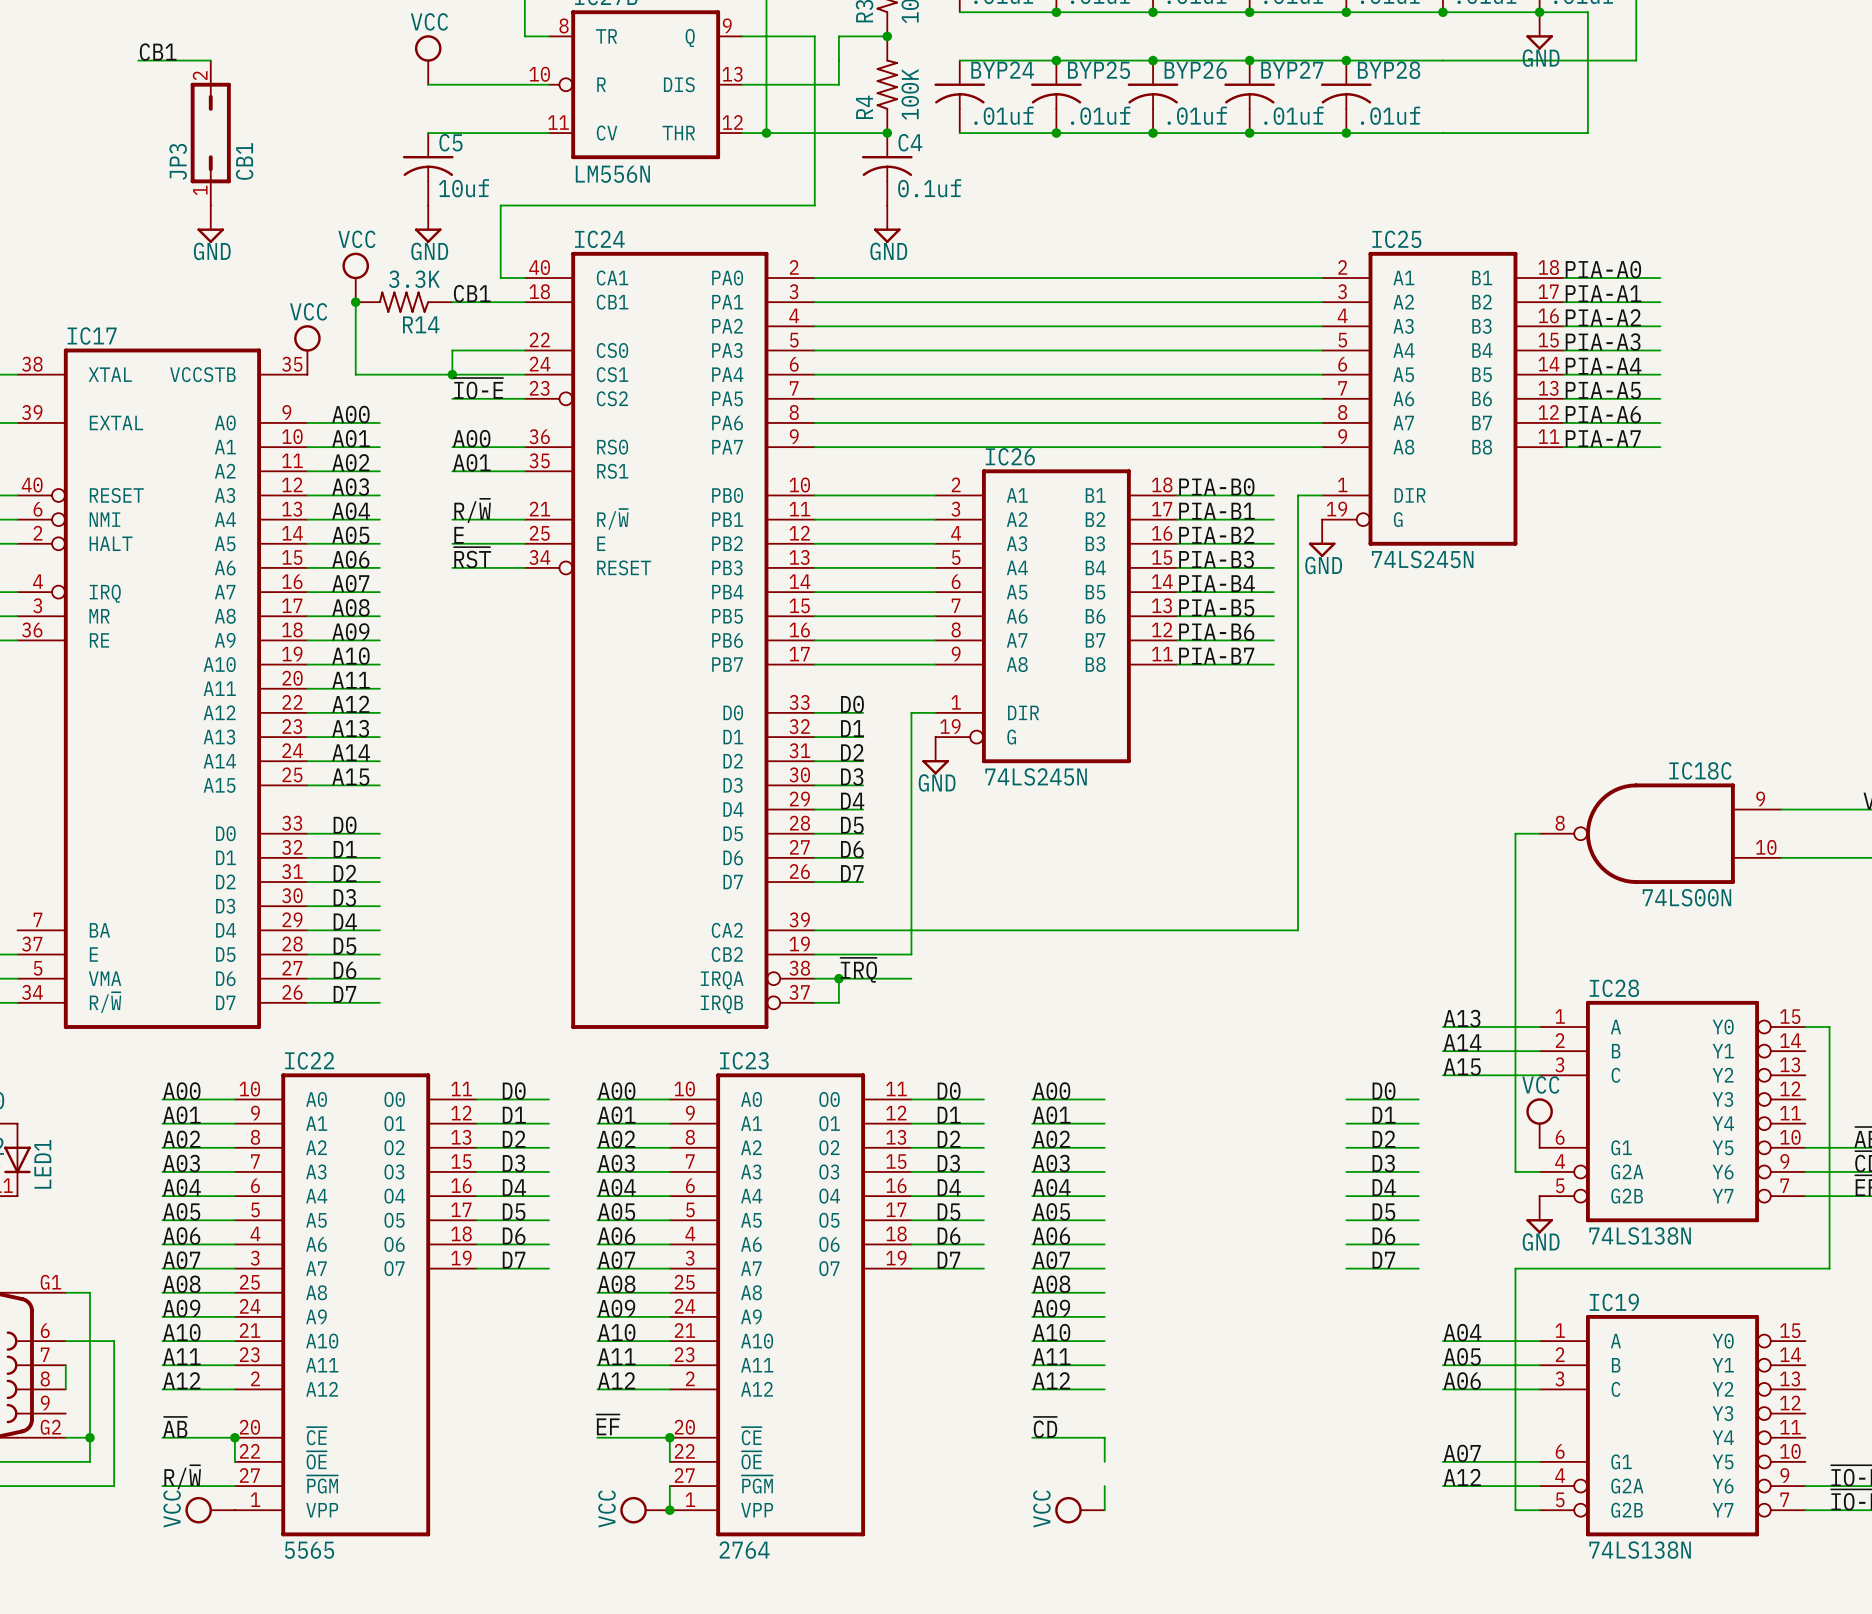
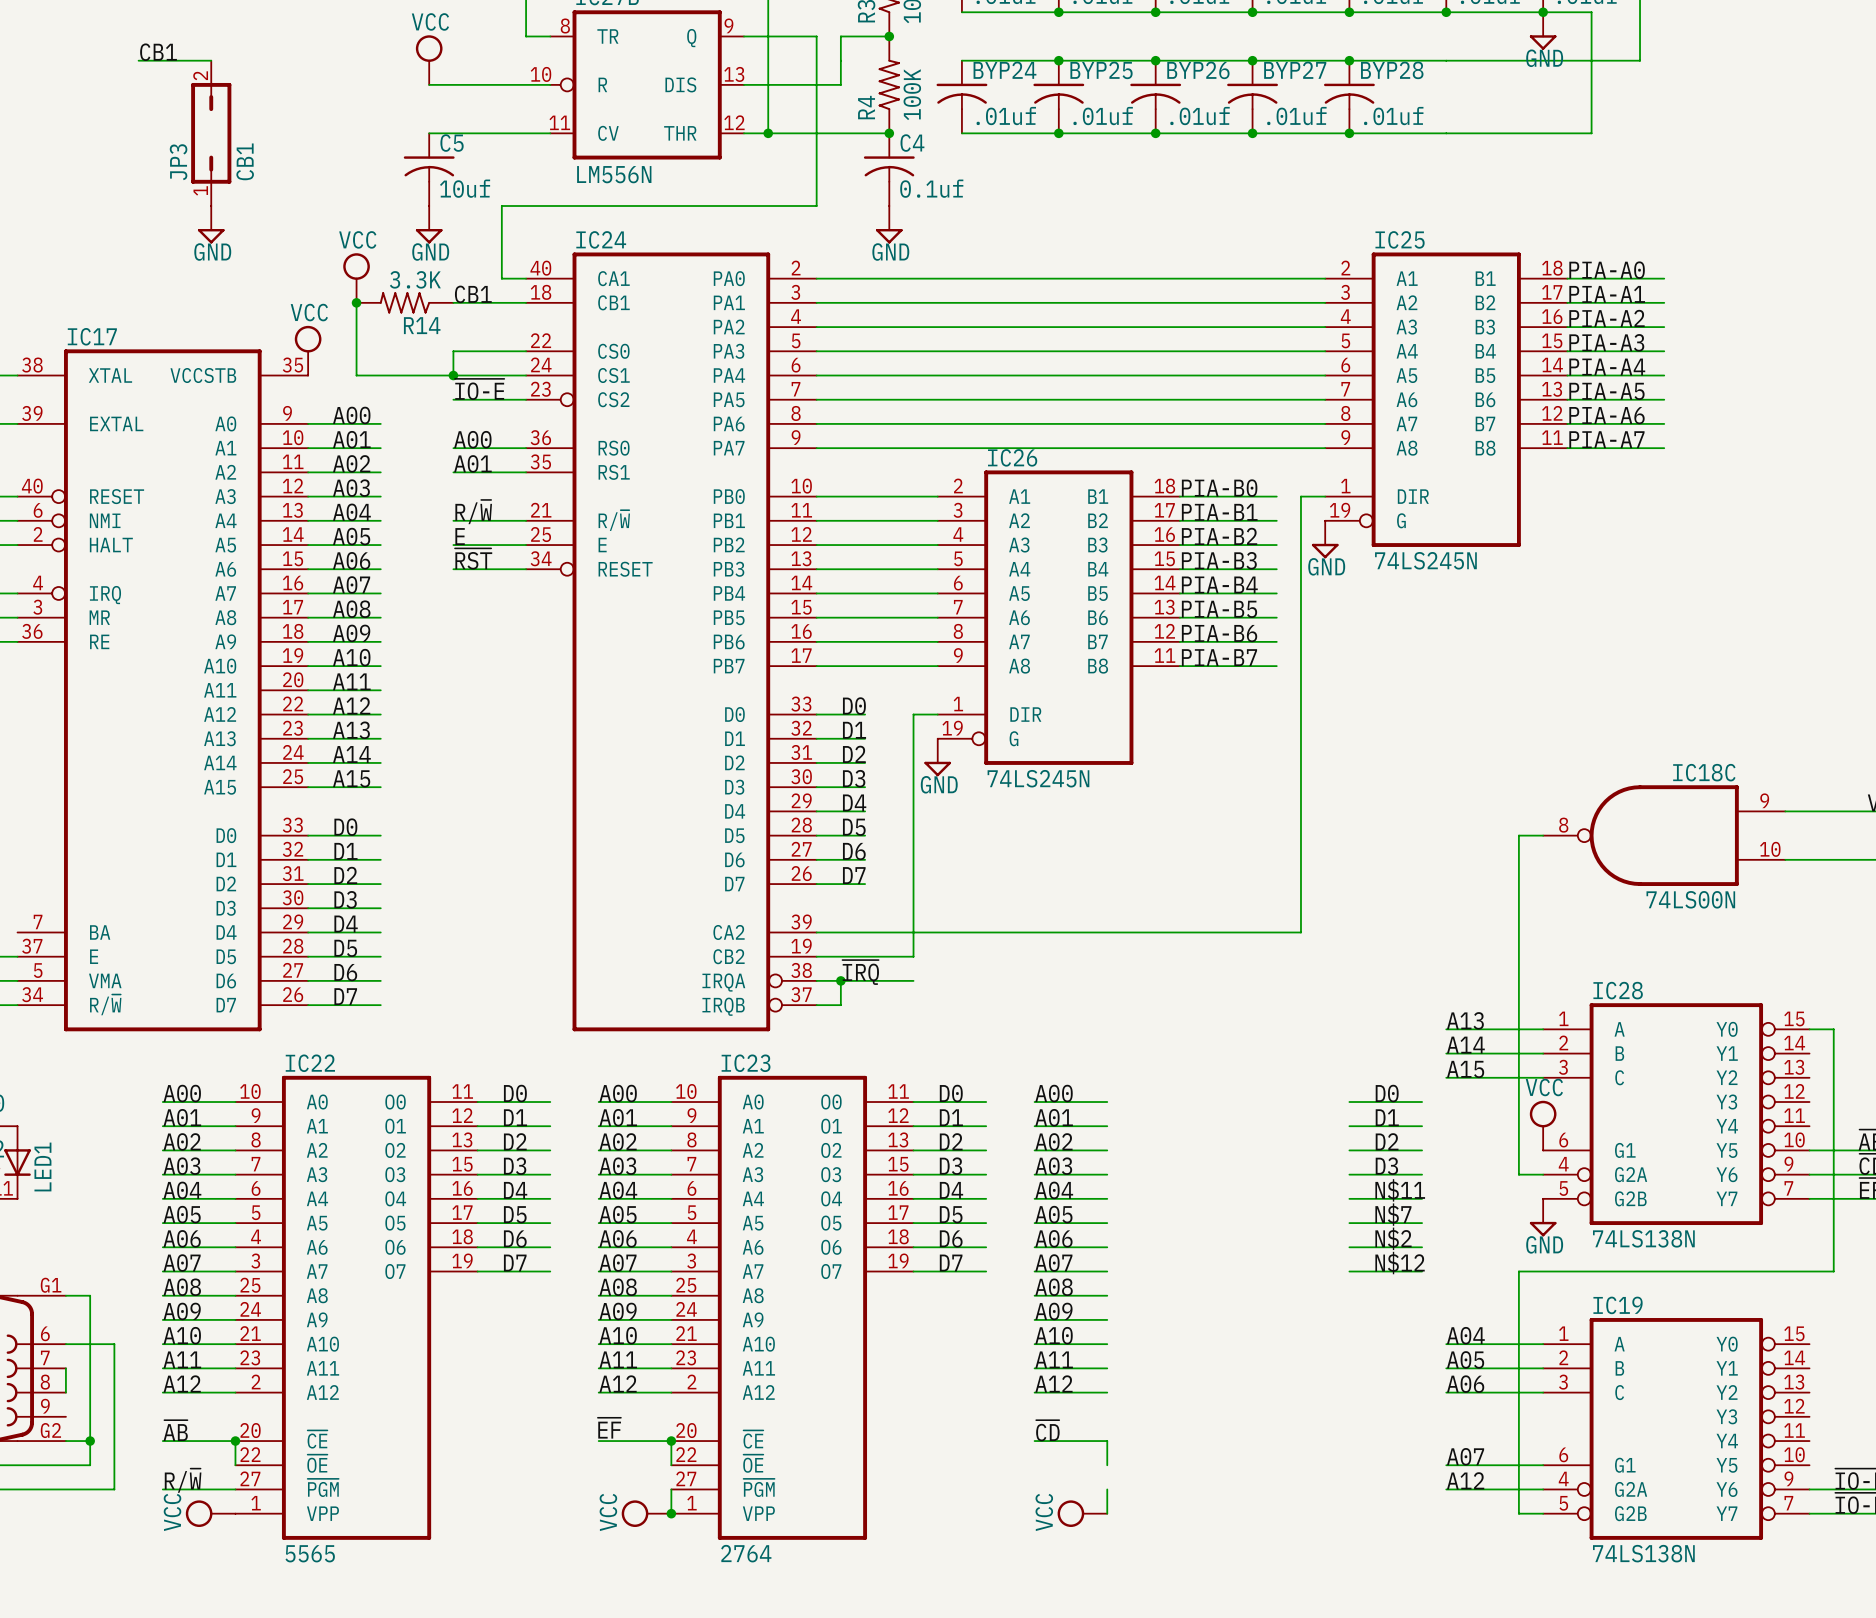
label: D4 (1384, 1187) -> N$11 (1400, 1190)
label: D5 (1383, 1211) -> N$7 (1393, 1214)
label: D6 (1383, 1236) -> N$2 (1393, 1238)
label: D7 (1383, 1260) -> N$12 (1400, 1263)

